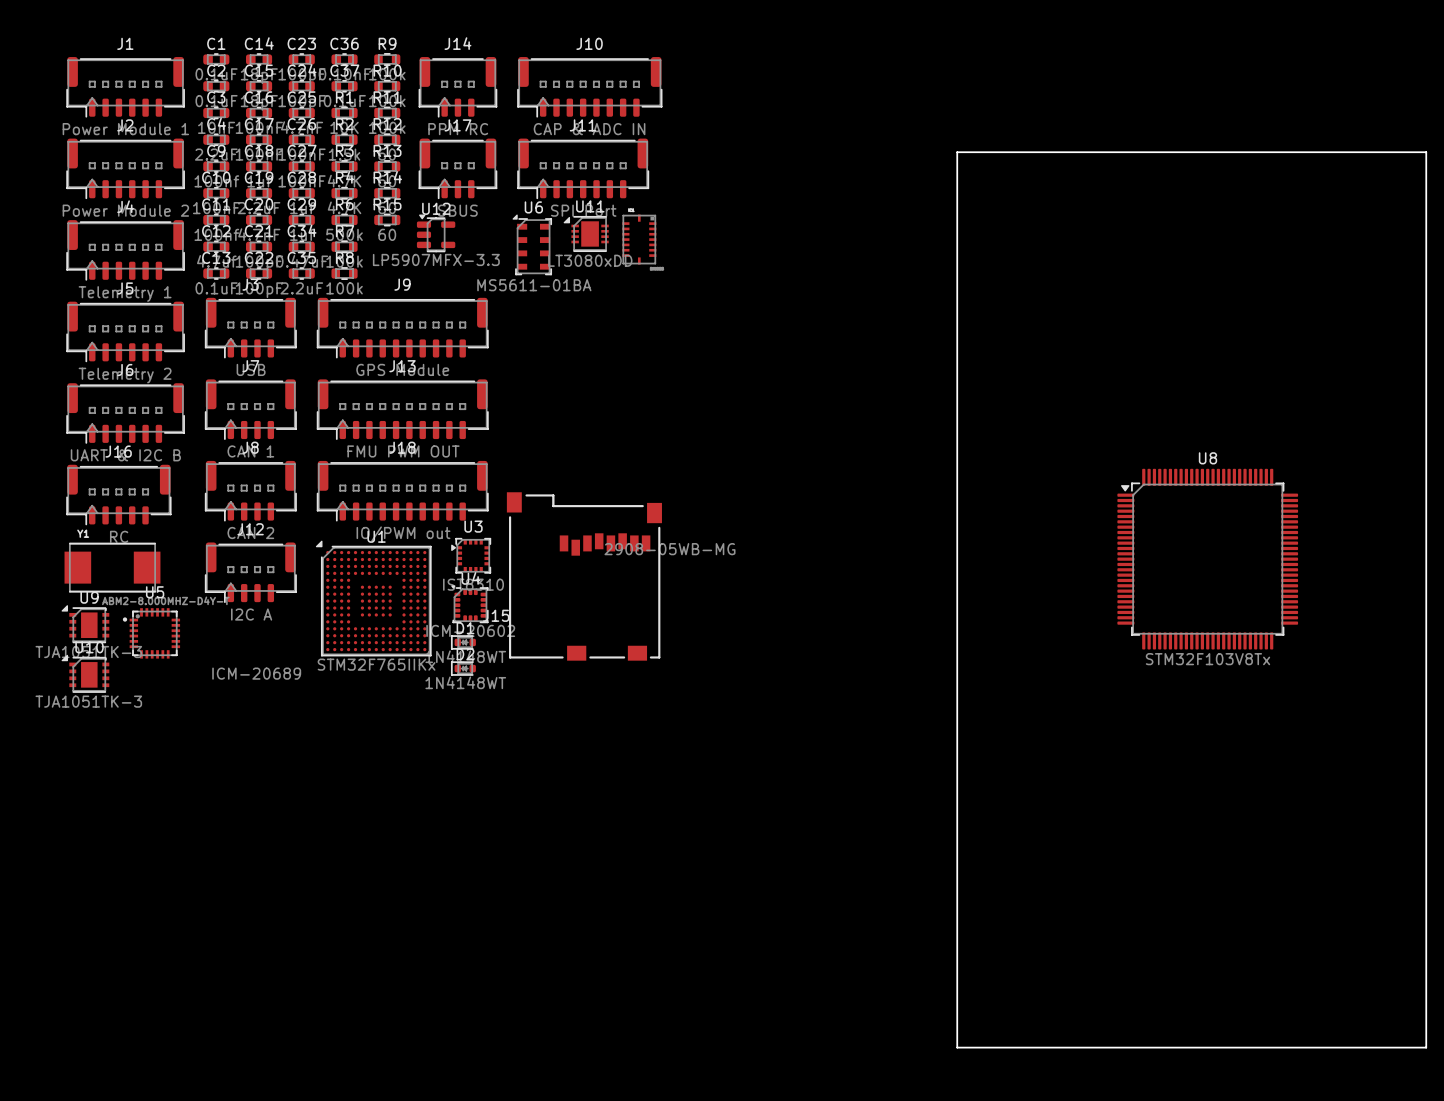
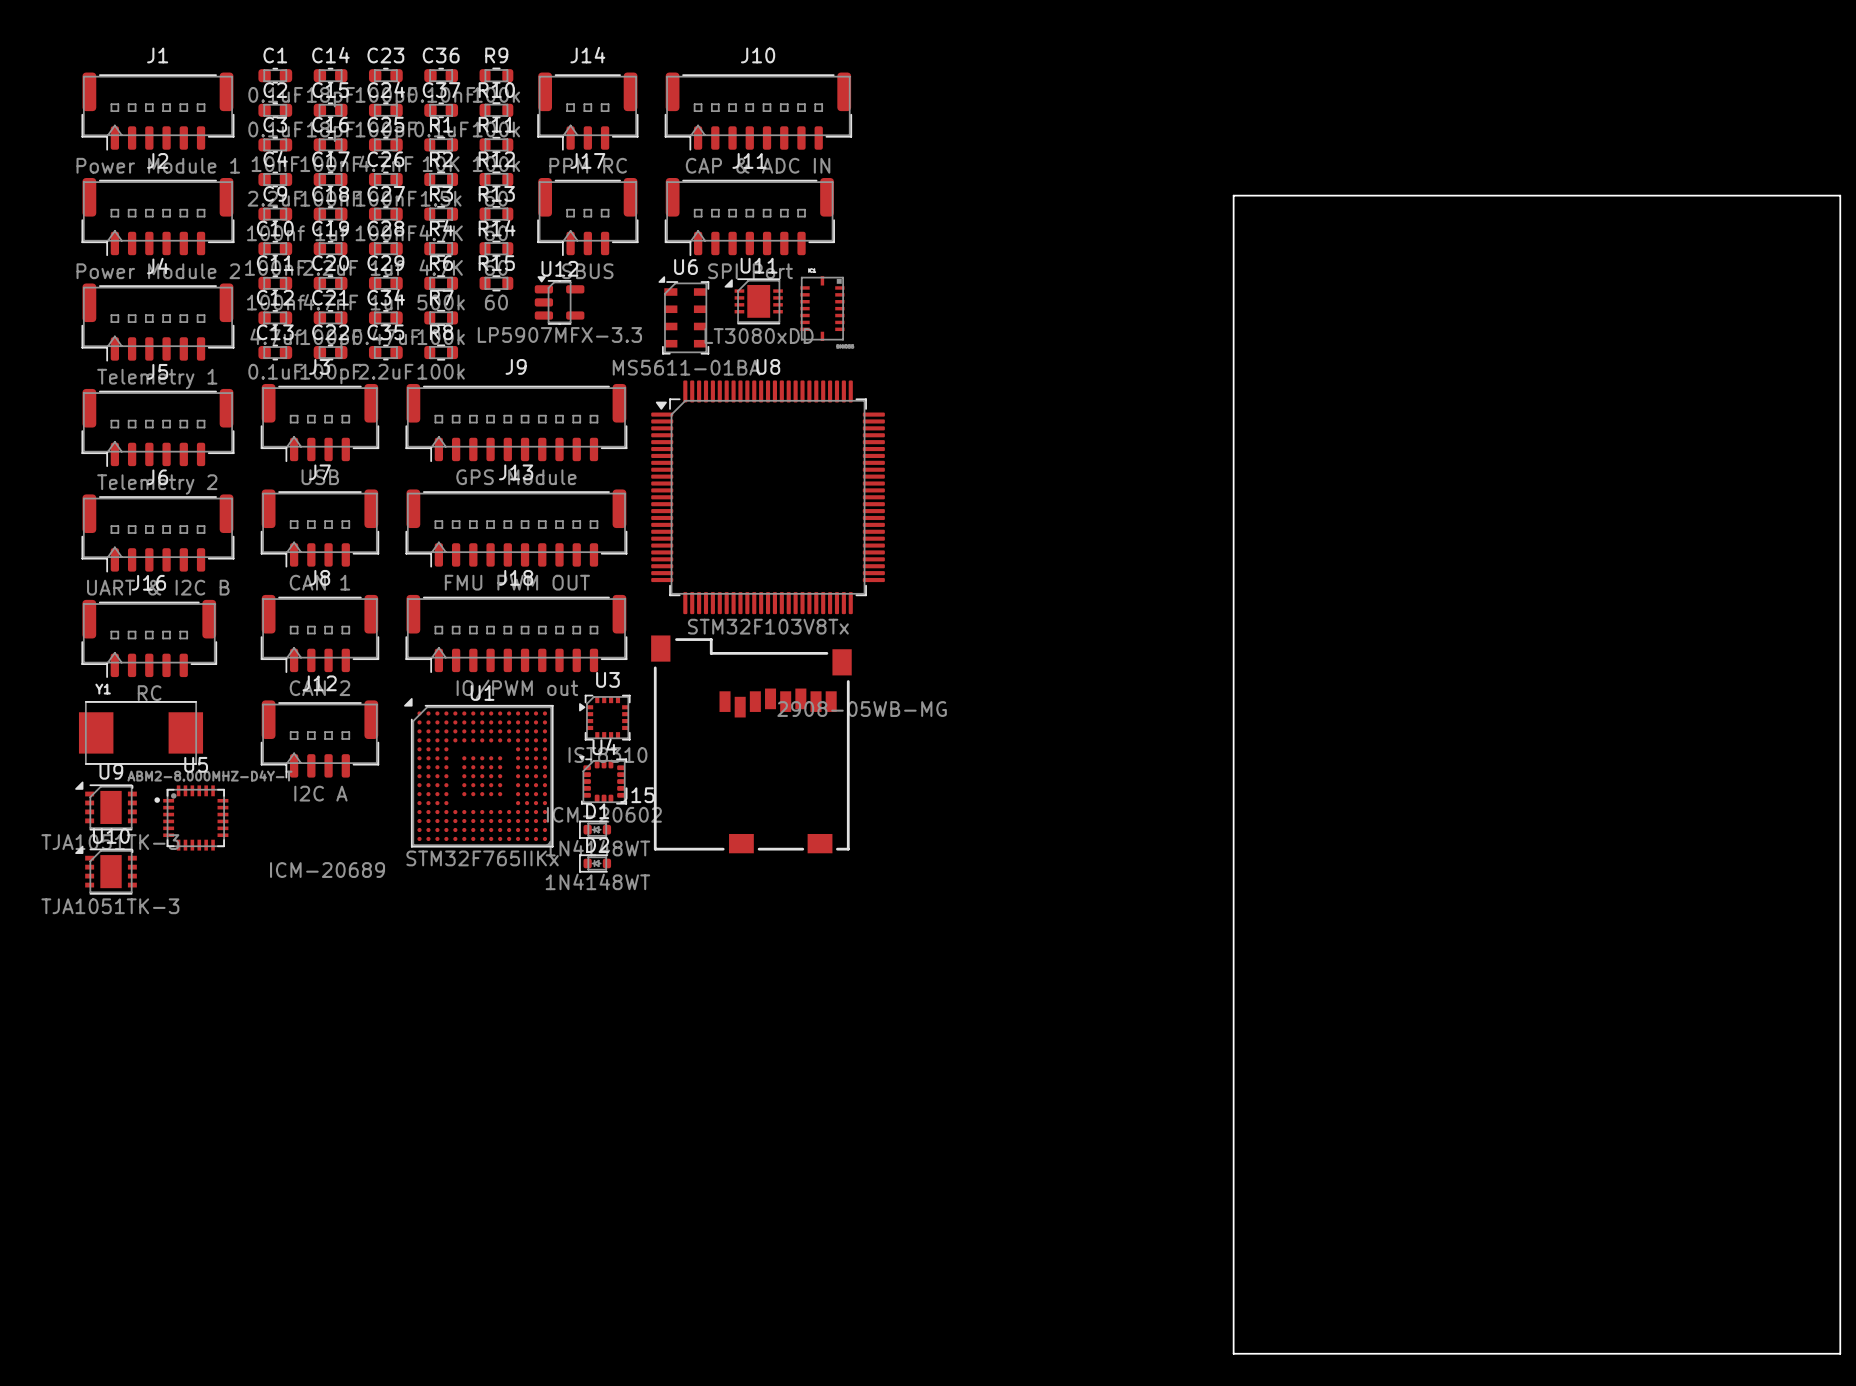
U8 position: (1207, 559) -> (768, 497)

